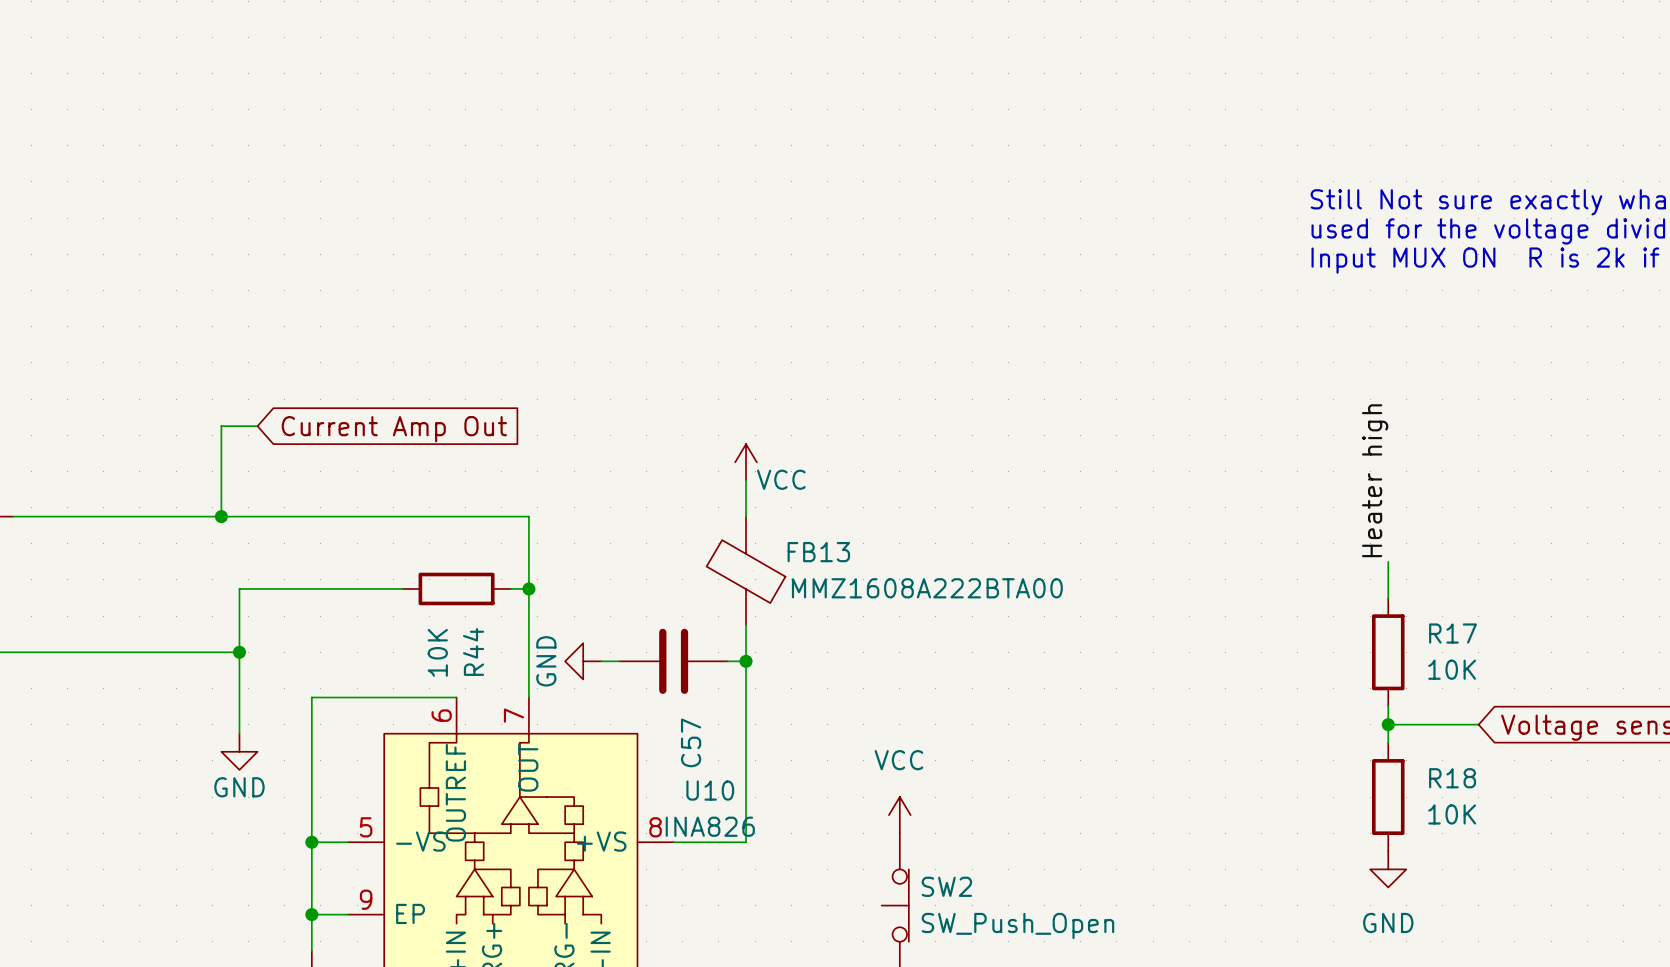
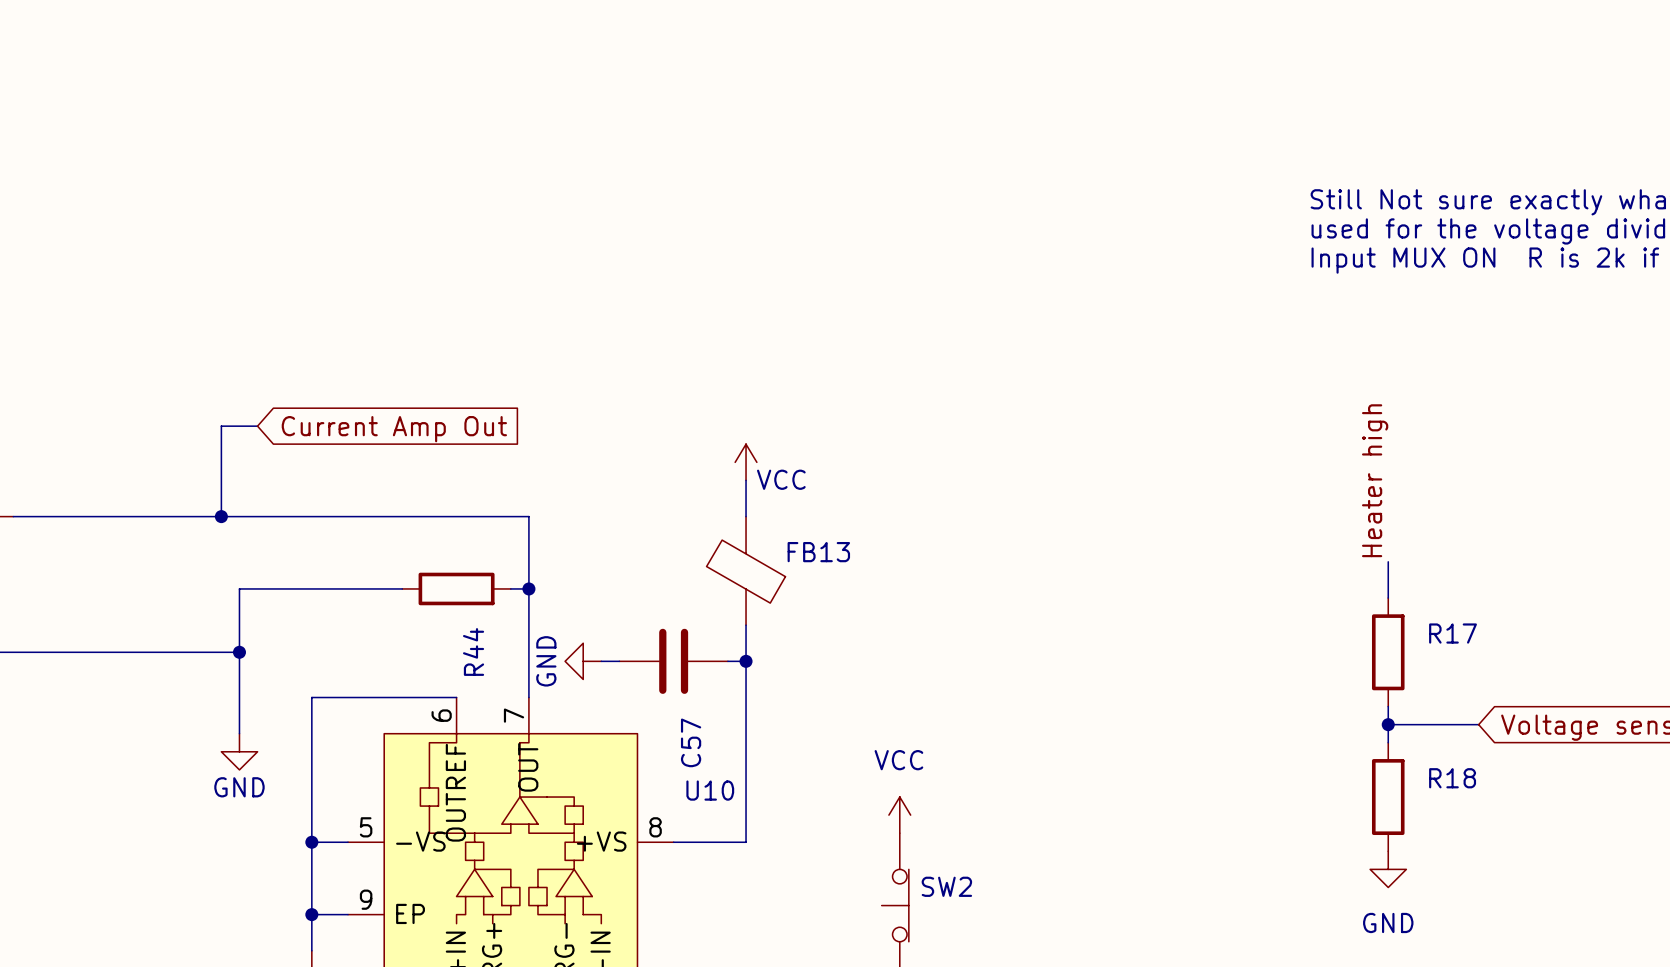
FB13 value: MMZ1608A222BTA00 (927, 588) -> none
R44 value: 10K (437, 652) -> none
R17 value: 10K (1452, 669) -> none
R18 value: 10K (1452, 814) -> none
U10 value: INA826 (710, 826) -> none
SW2 value: SW_Push_Open (1017, 925) -> none

